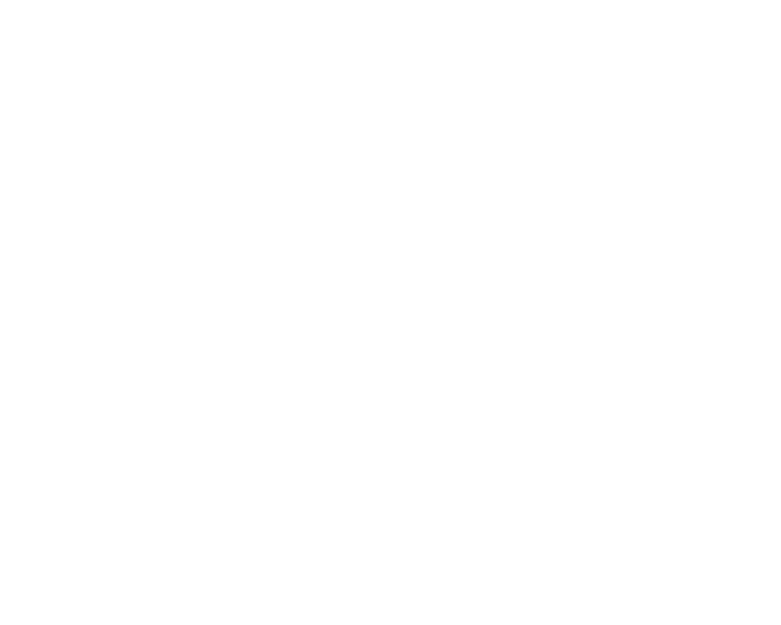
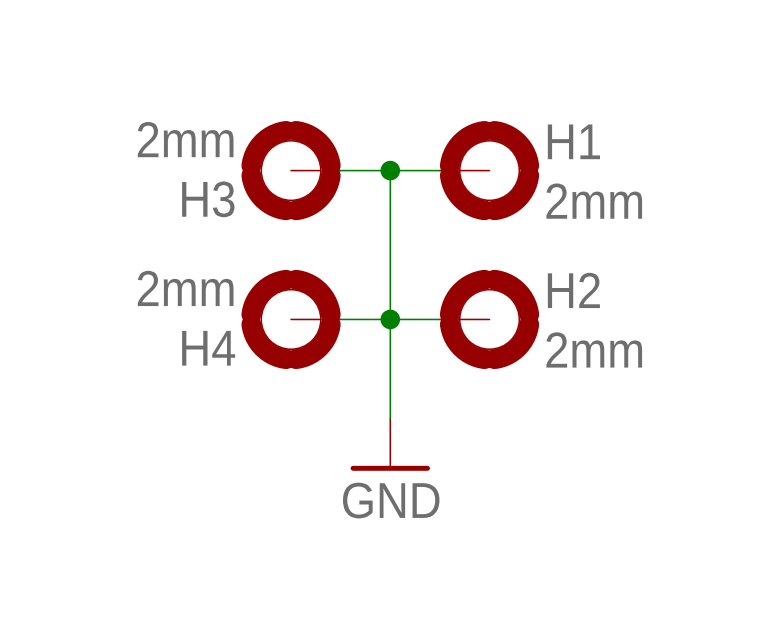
H3: none -> 2mm (291, 170)
wire: none -> (340, 170) (439, 170)
wire: none -> (390, 170) (390, 418)
junction: none -> (390, 170)
H1: none -> 2mm (489, 170)
H4: none -> 2mm (291, 319)
wire: none -> (340, 319) (439, 319)
junction: none -> (390, 319)
H2: none -> 2mm (489, 319)
power symbol: none -> GND (390, 444)

